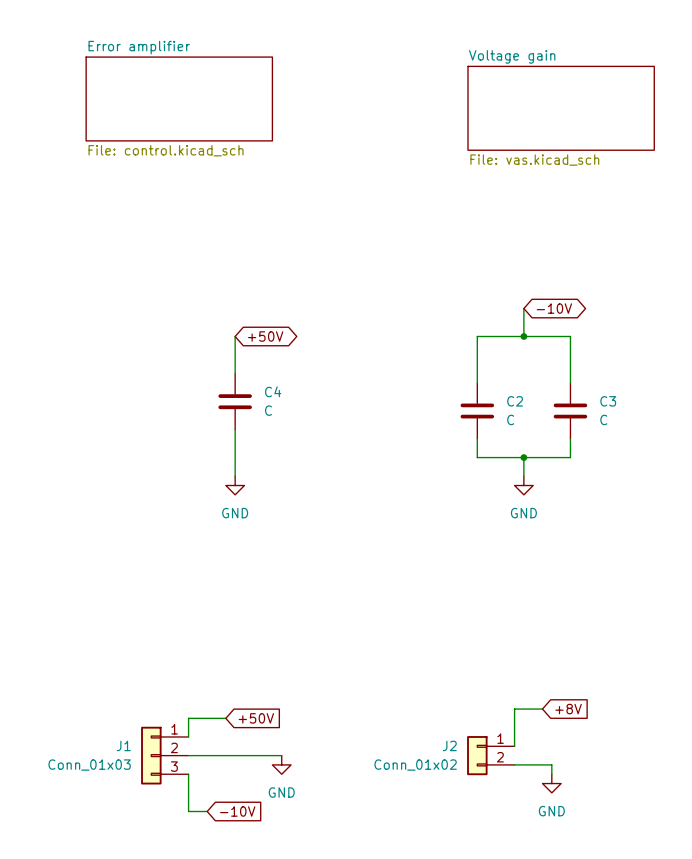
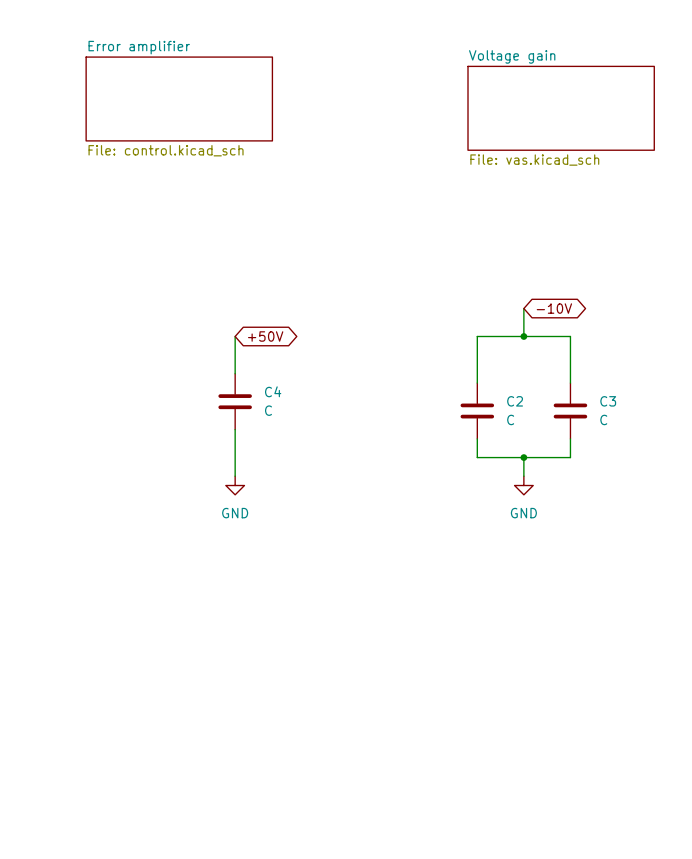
wire: (542, 709) (514, 709) (514, 746) -> none
global label: +8V (568, 709) -> none
wire: (225, 718) (188, 718) (188, 736) -> none
global label: +50V (256, 718) -> none
J1: Conn_01x03 (164, 755) -> none
wire: (188, 755) (281, 755) -> none
J2: Conn_01x02 (490, 755) -> none
power symbol: GND (281, 764) -> none
wire: (514, 764) (551, 764) (551, 774) -> none
wire: (188, 774) (188, 811) (207, 811) -> none
power symbol: GND (551, 783) -> none
global label: -10V (237, 811) -> none

